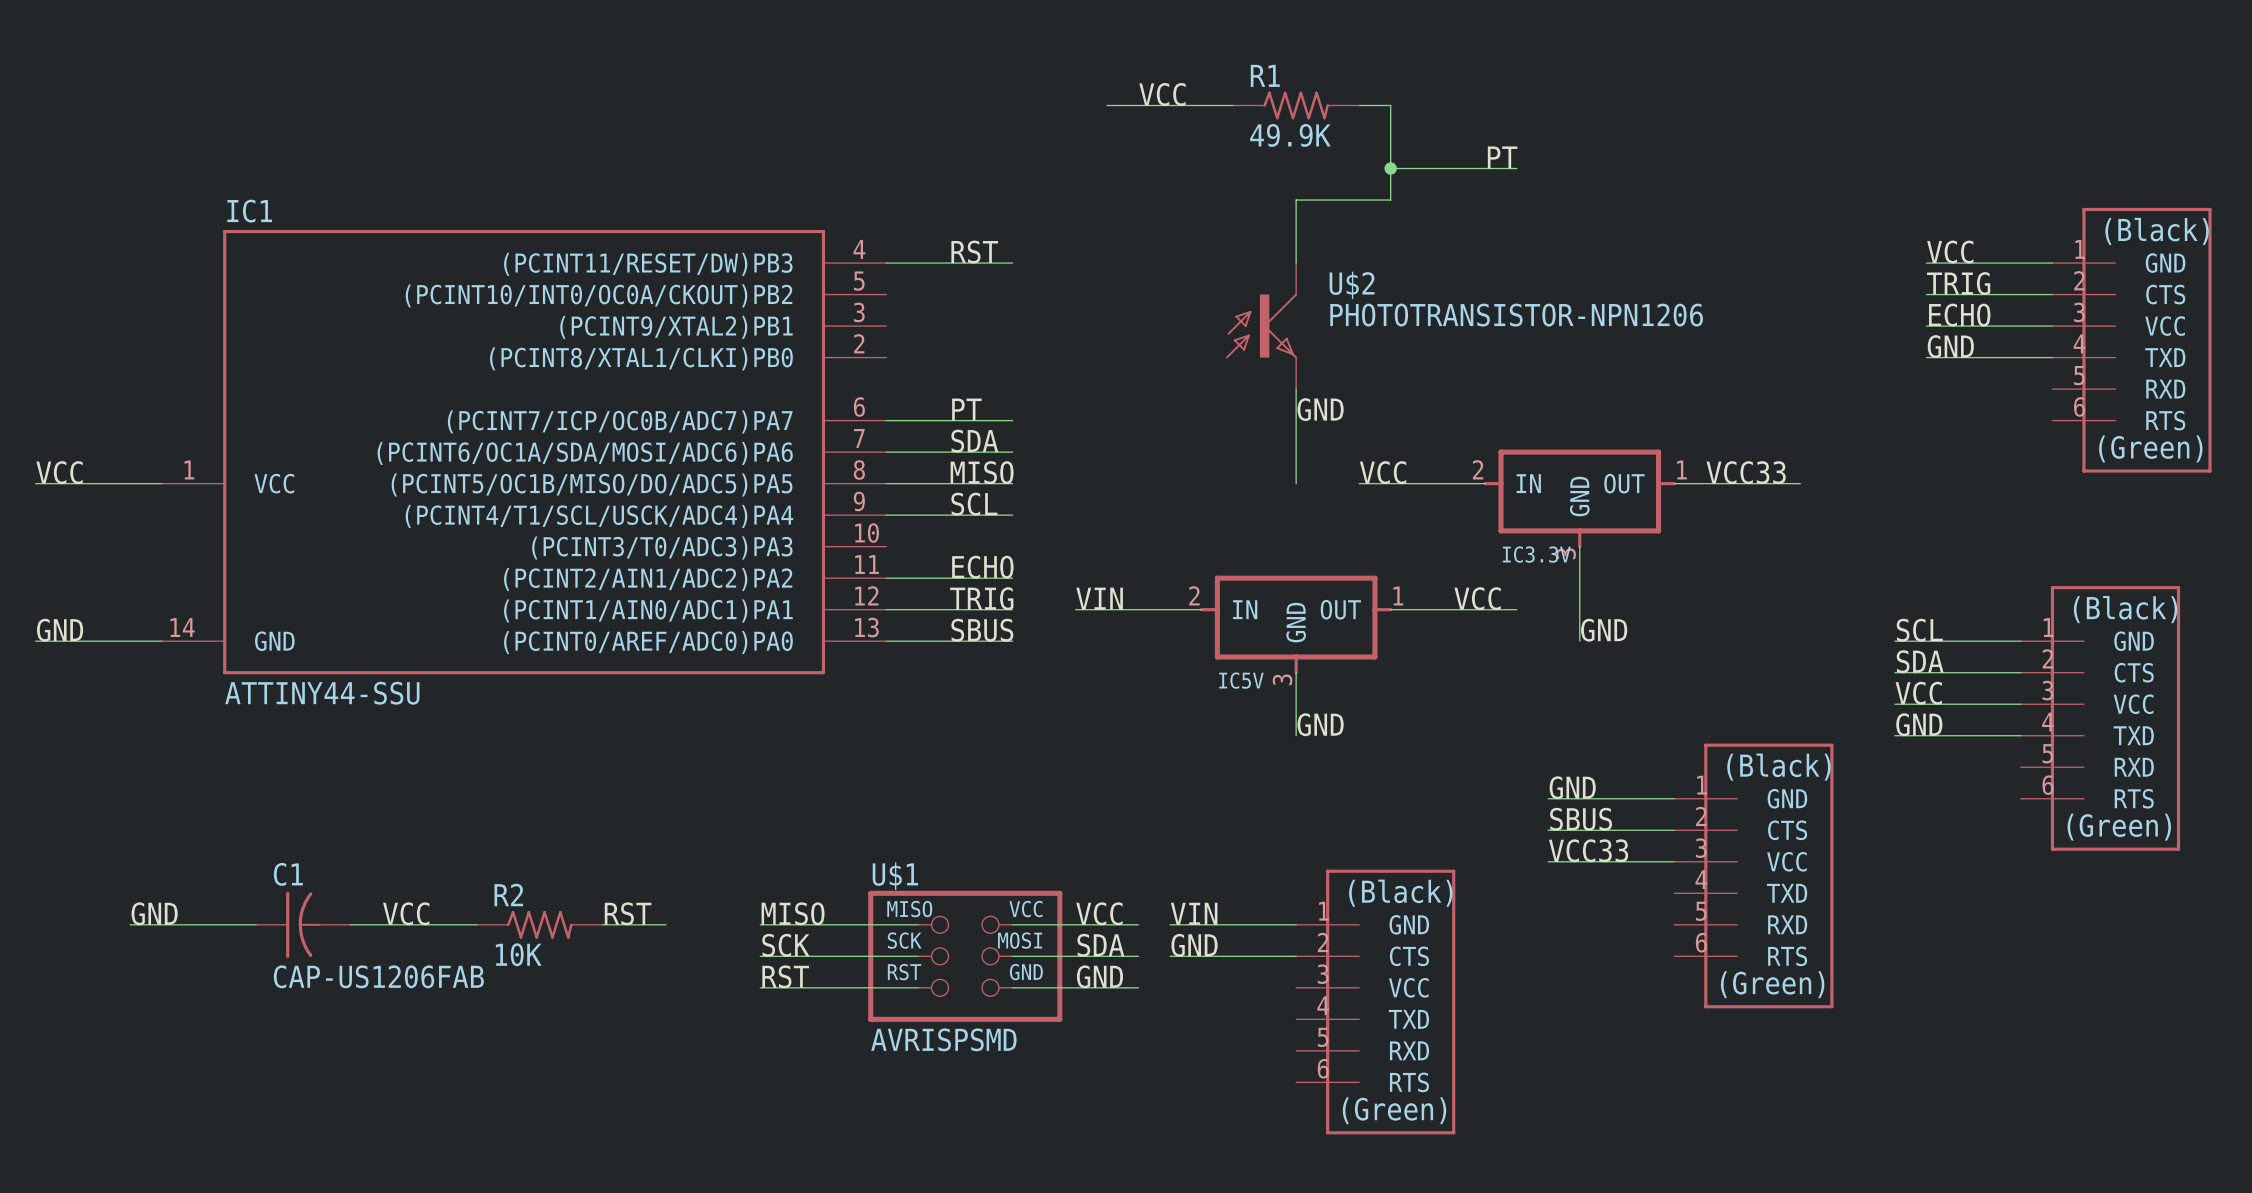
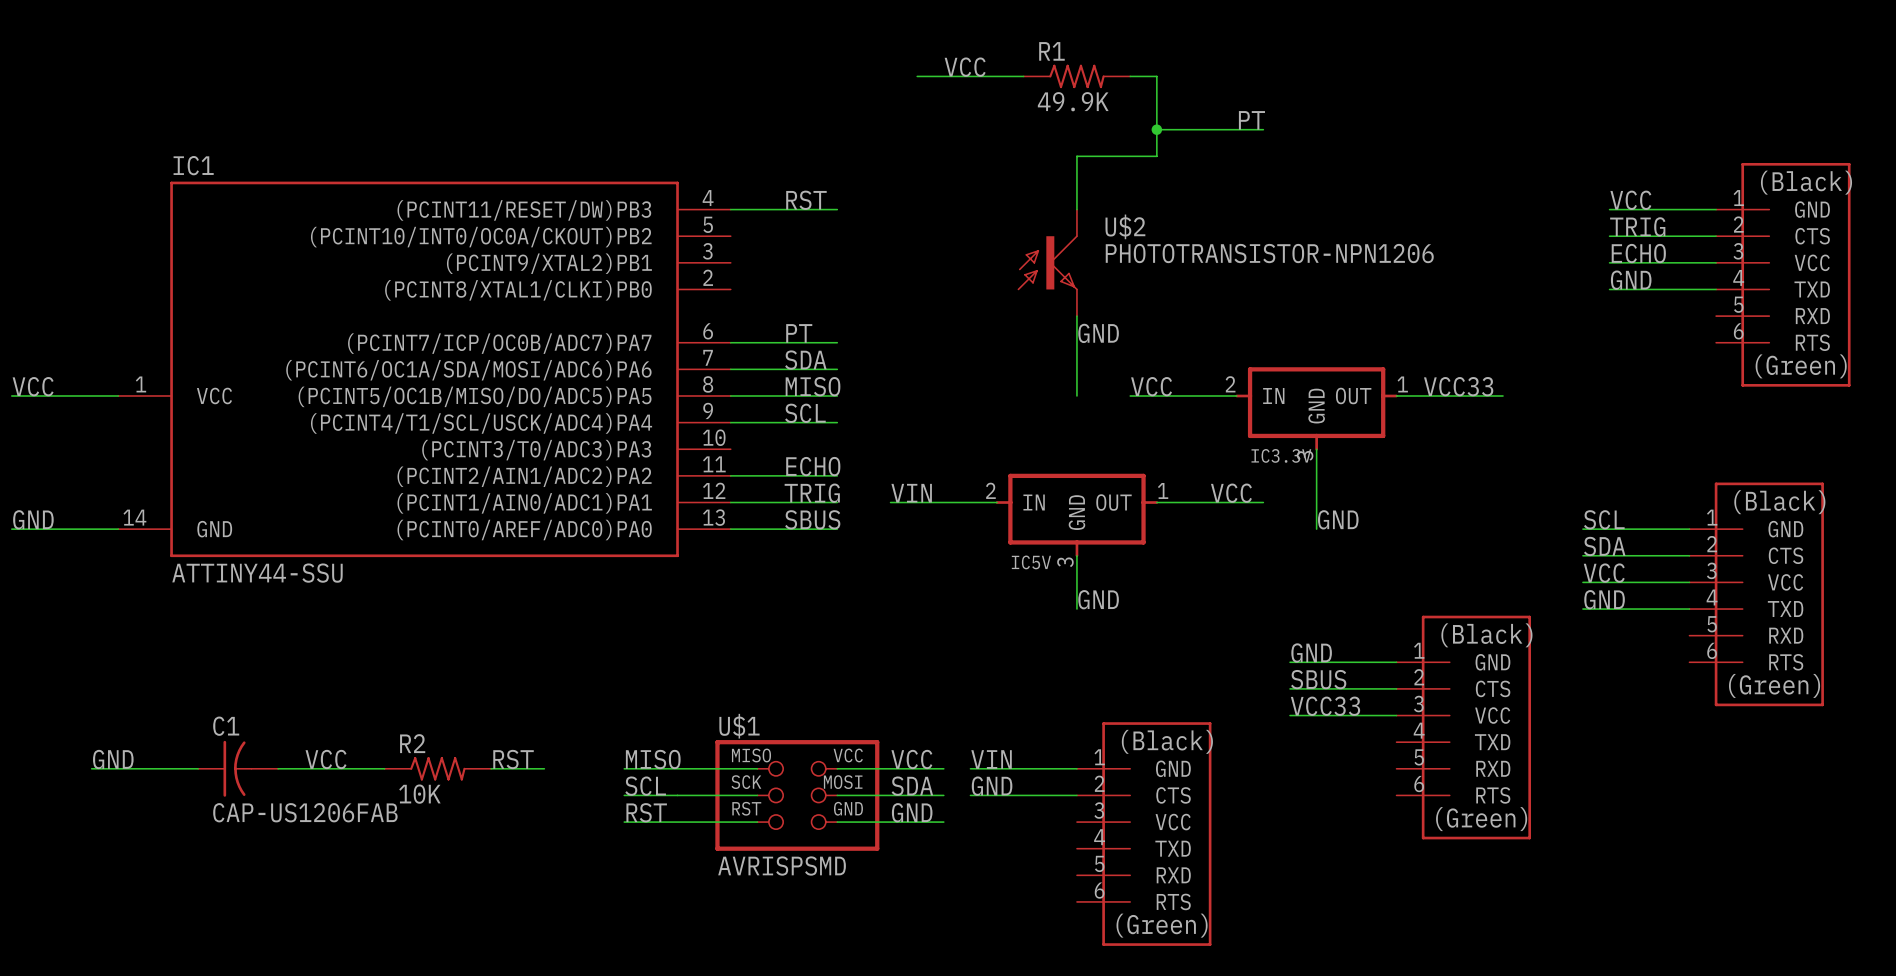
label: SCK (785, 945) -> SCL (645, 786)

